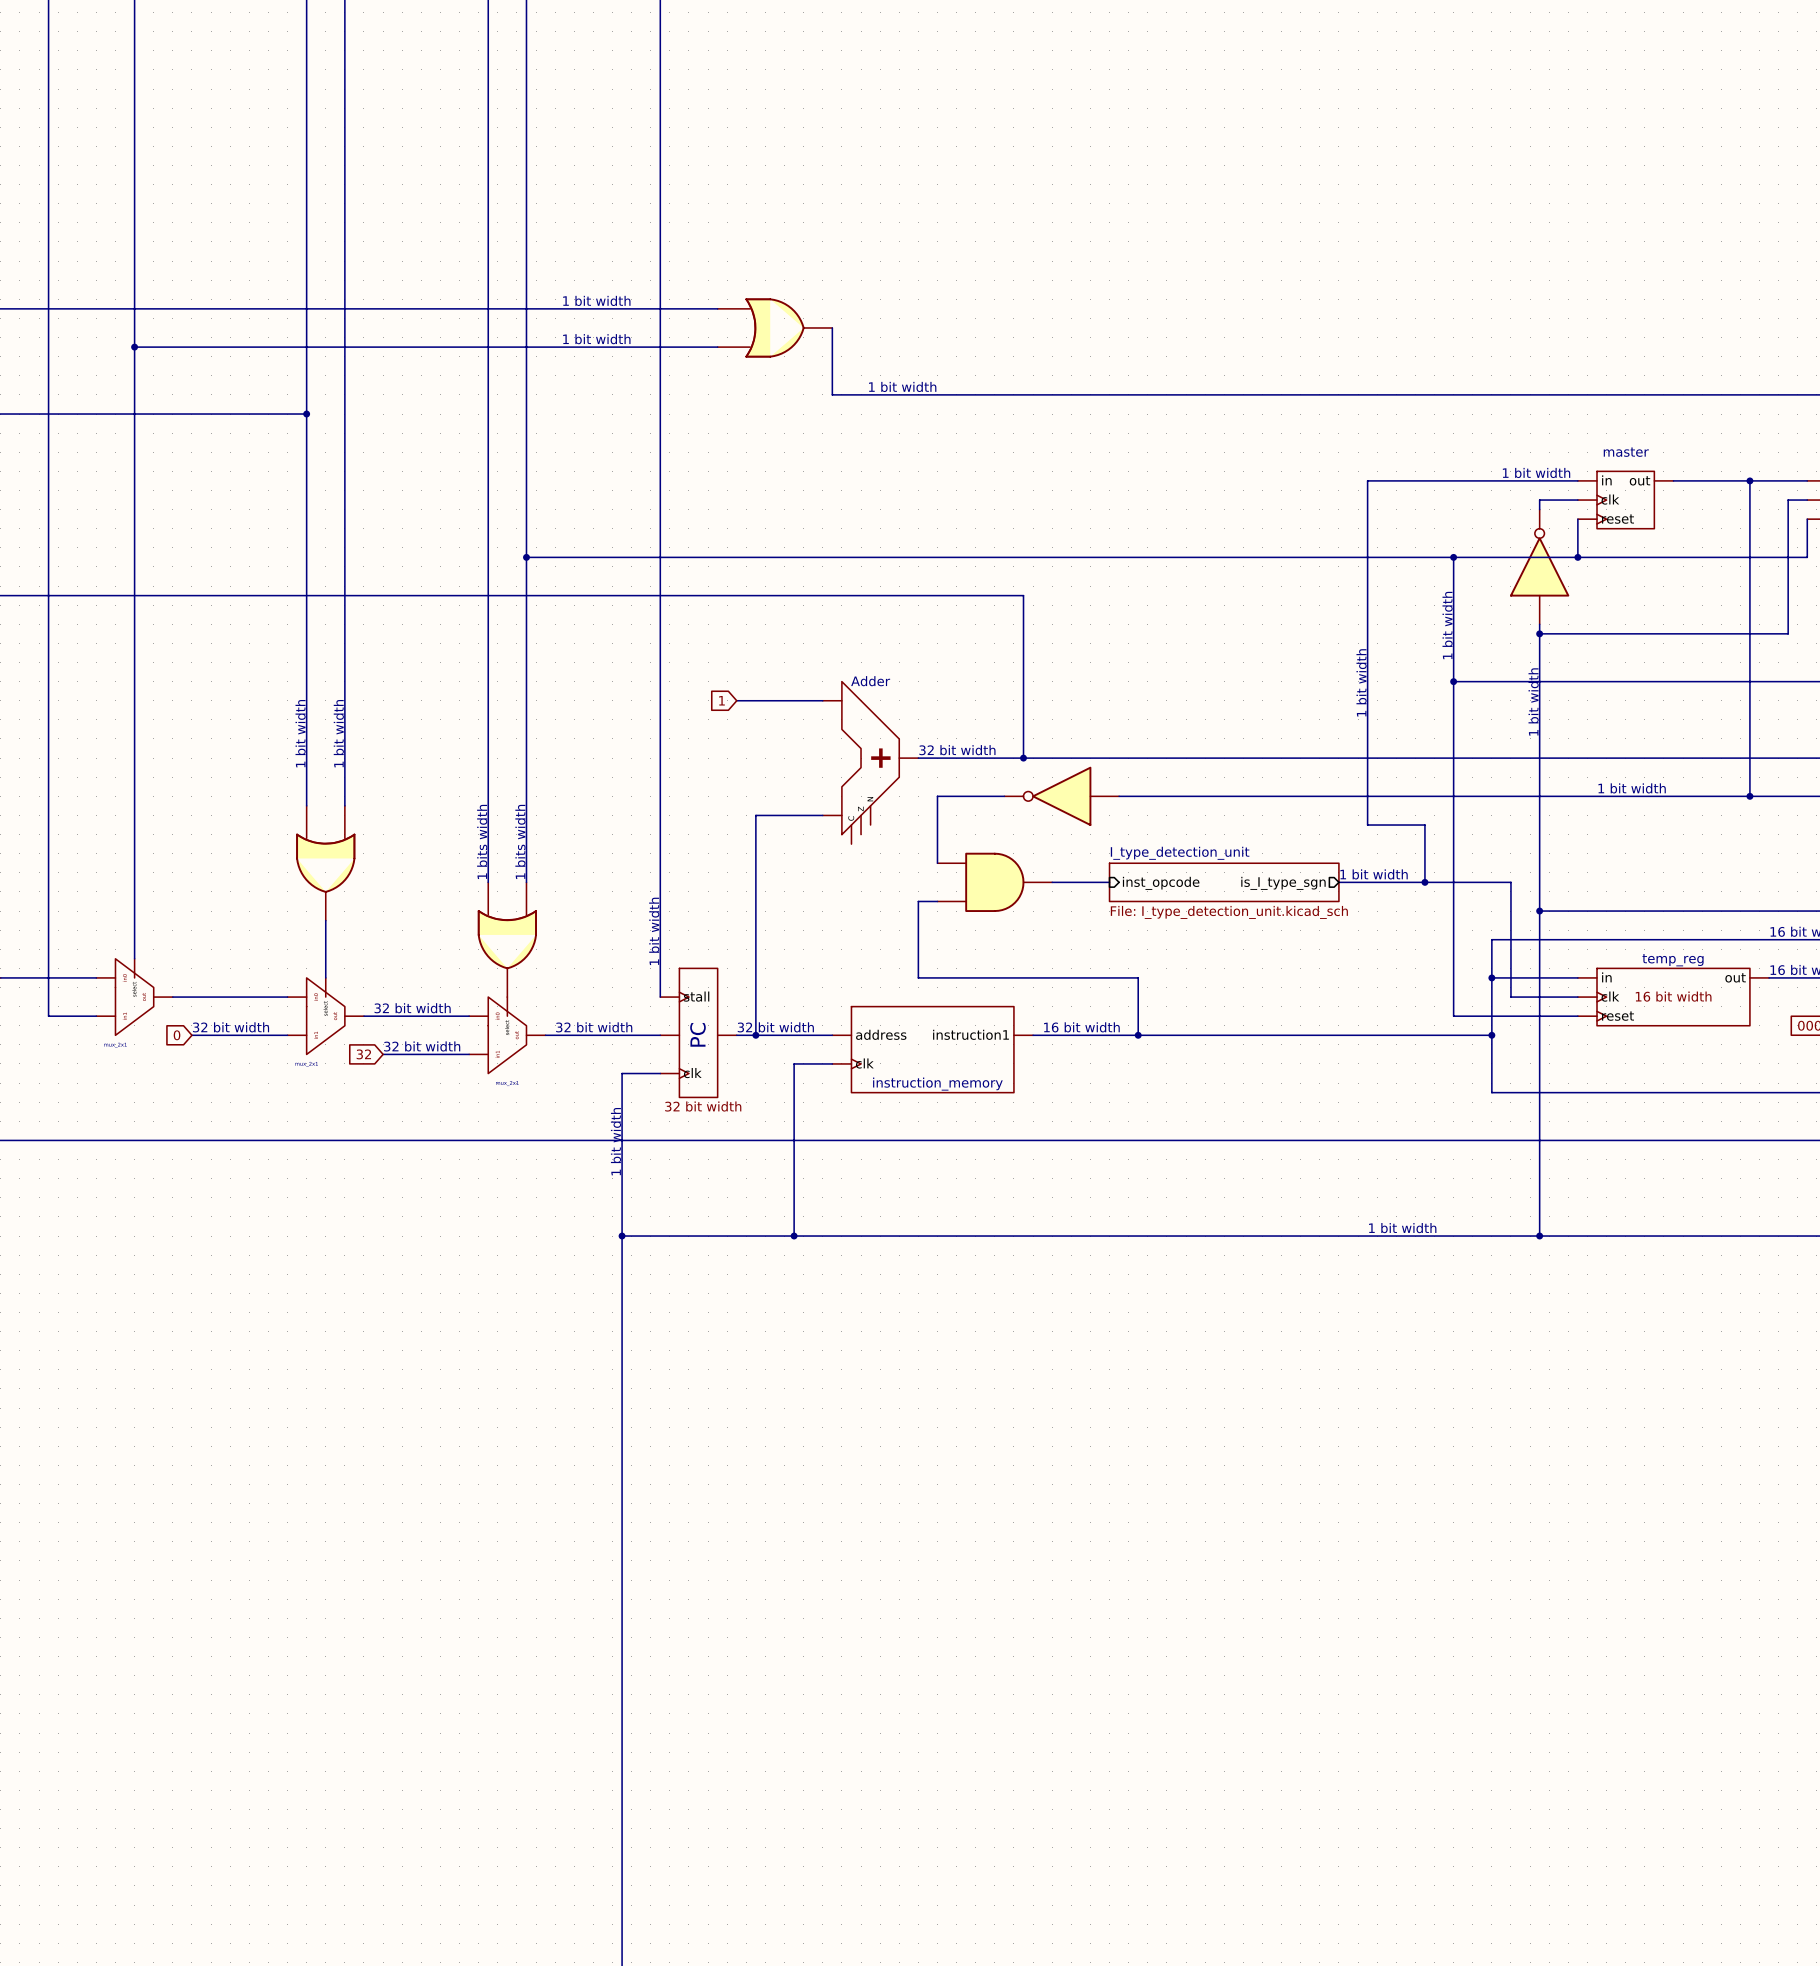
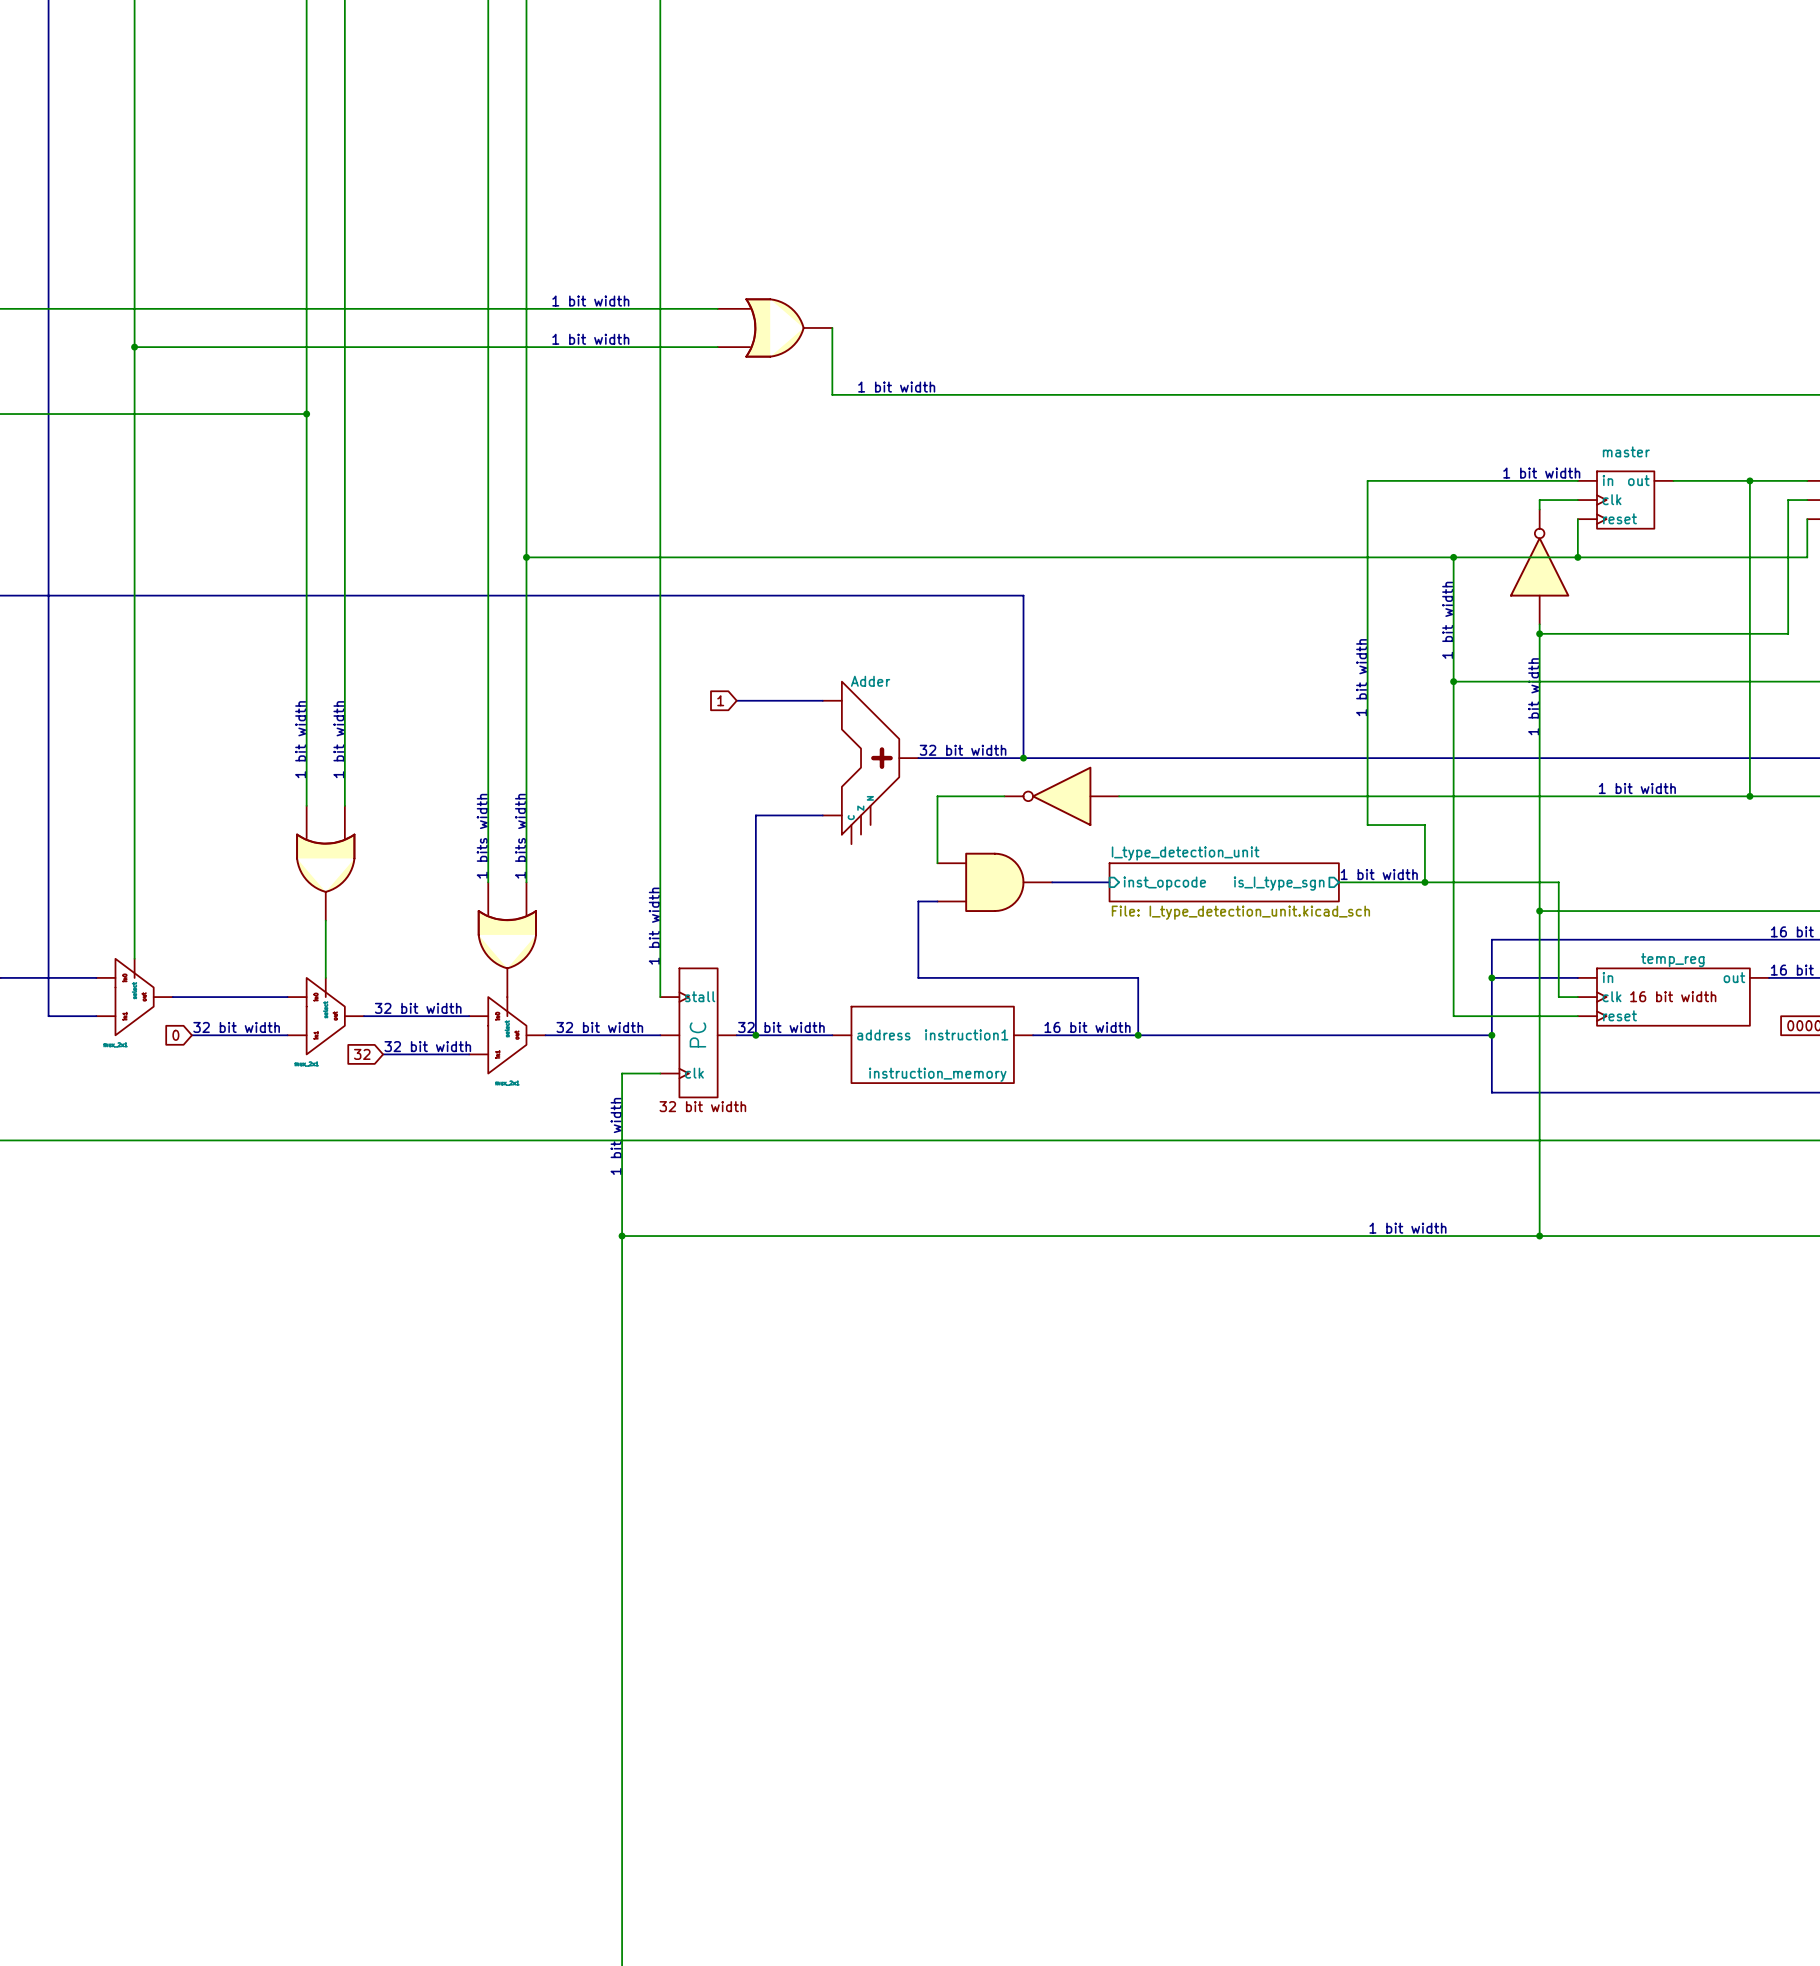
wire: (1510, 882) (1510, 997) (1558, 997) -> (1510, 882) (1558, 882) (1558, 997)
part symbol: [832, 1006, 1034, 1093] -> [832, 1006, 1034, 1084]
wire: (832, 1063) (794, 1063) (794, 1236) -> none
junction: (794, 1236) -> none

